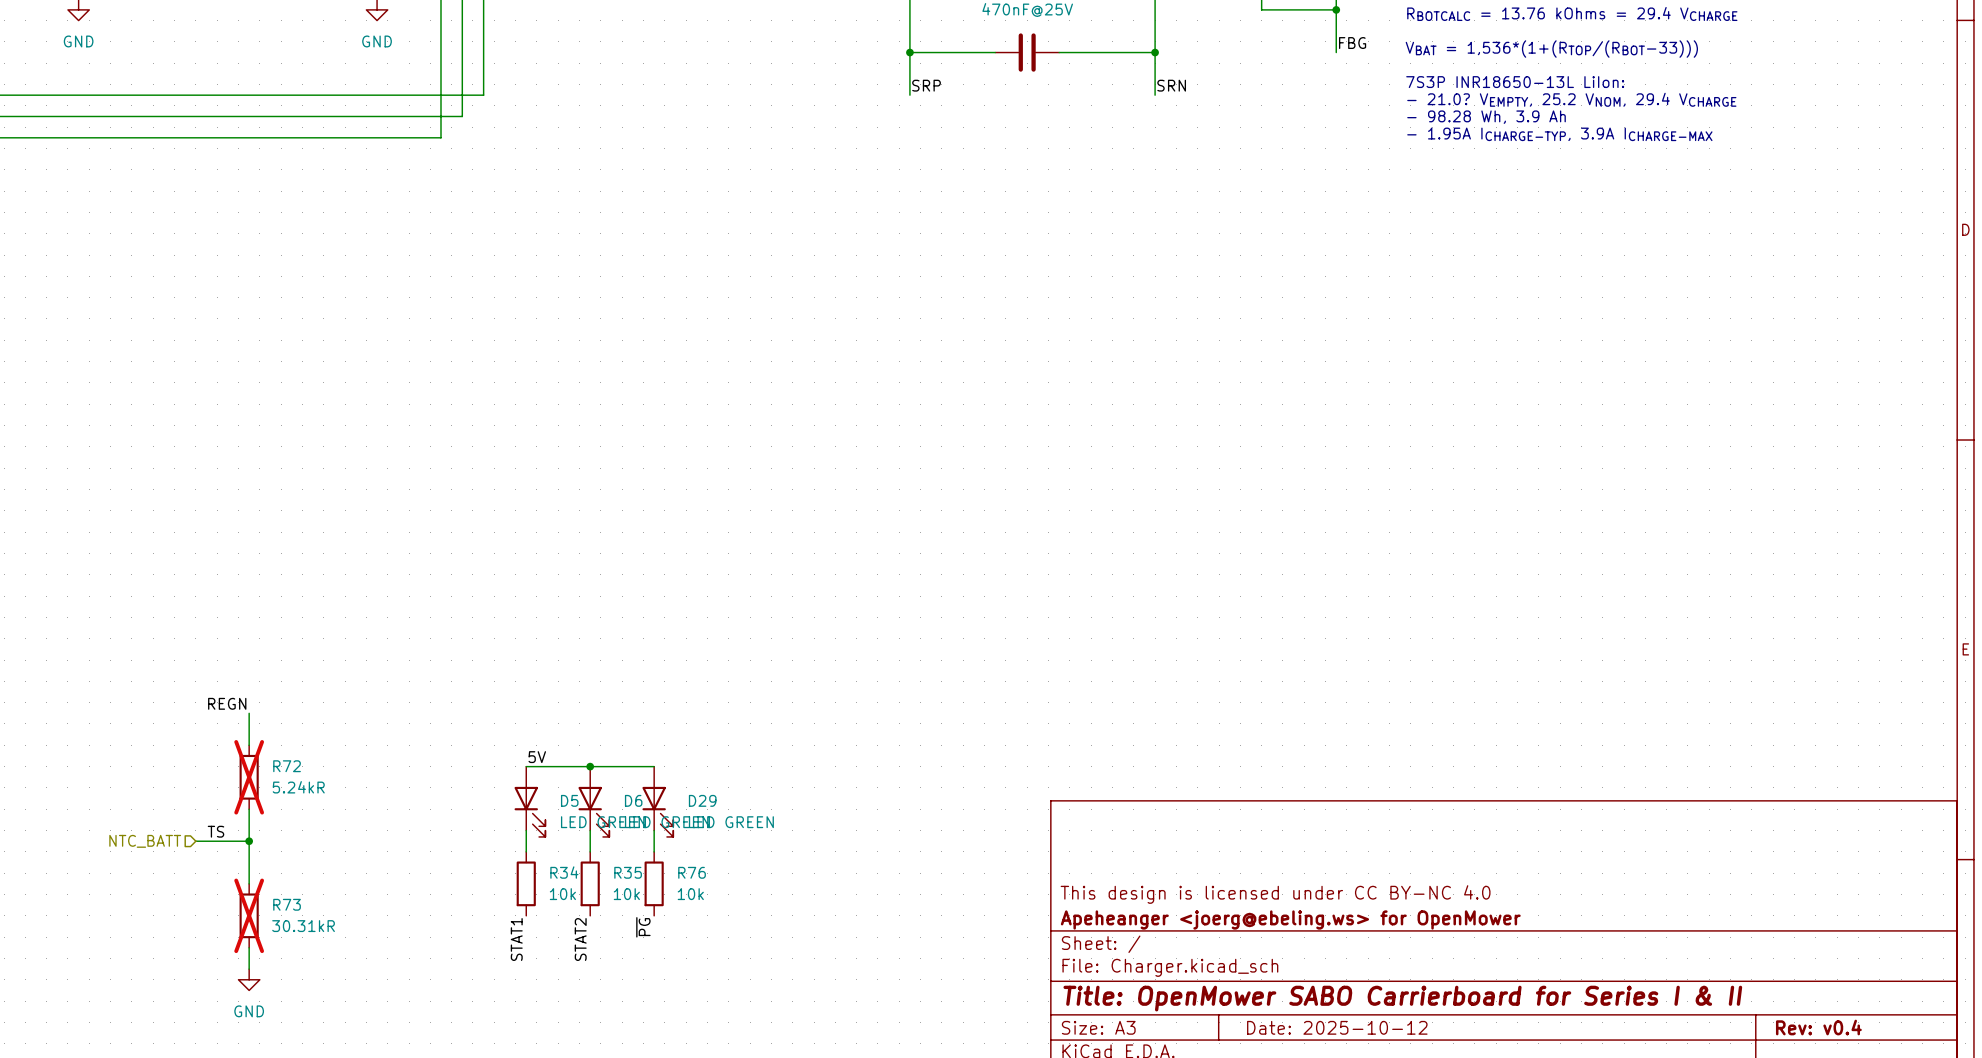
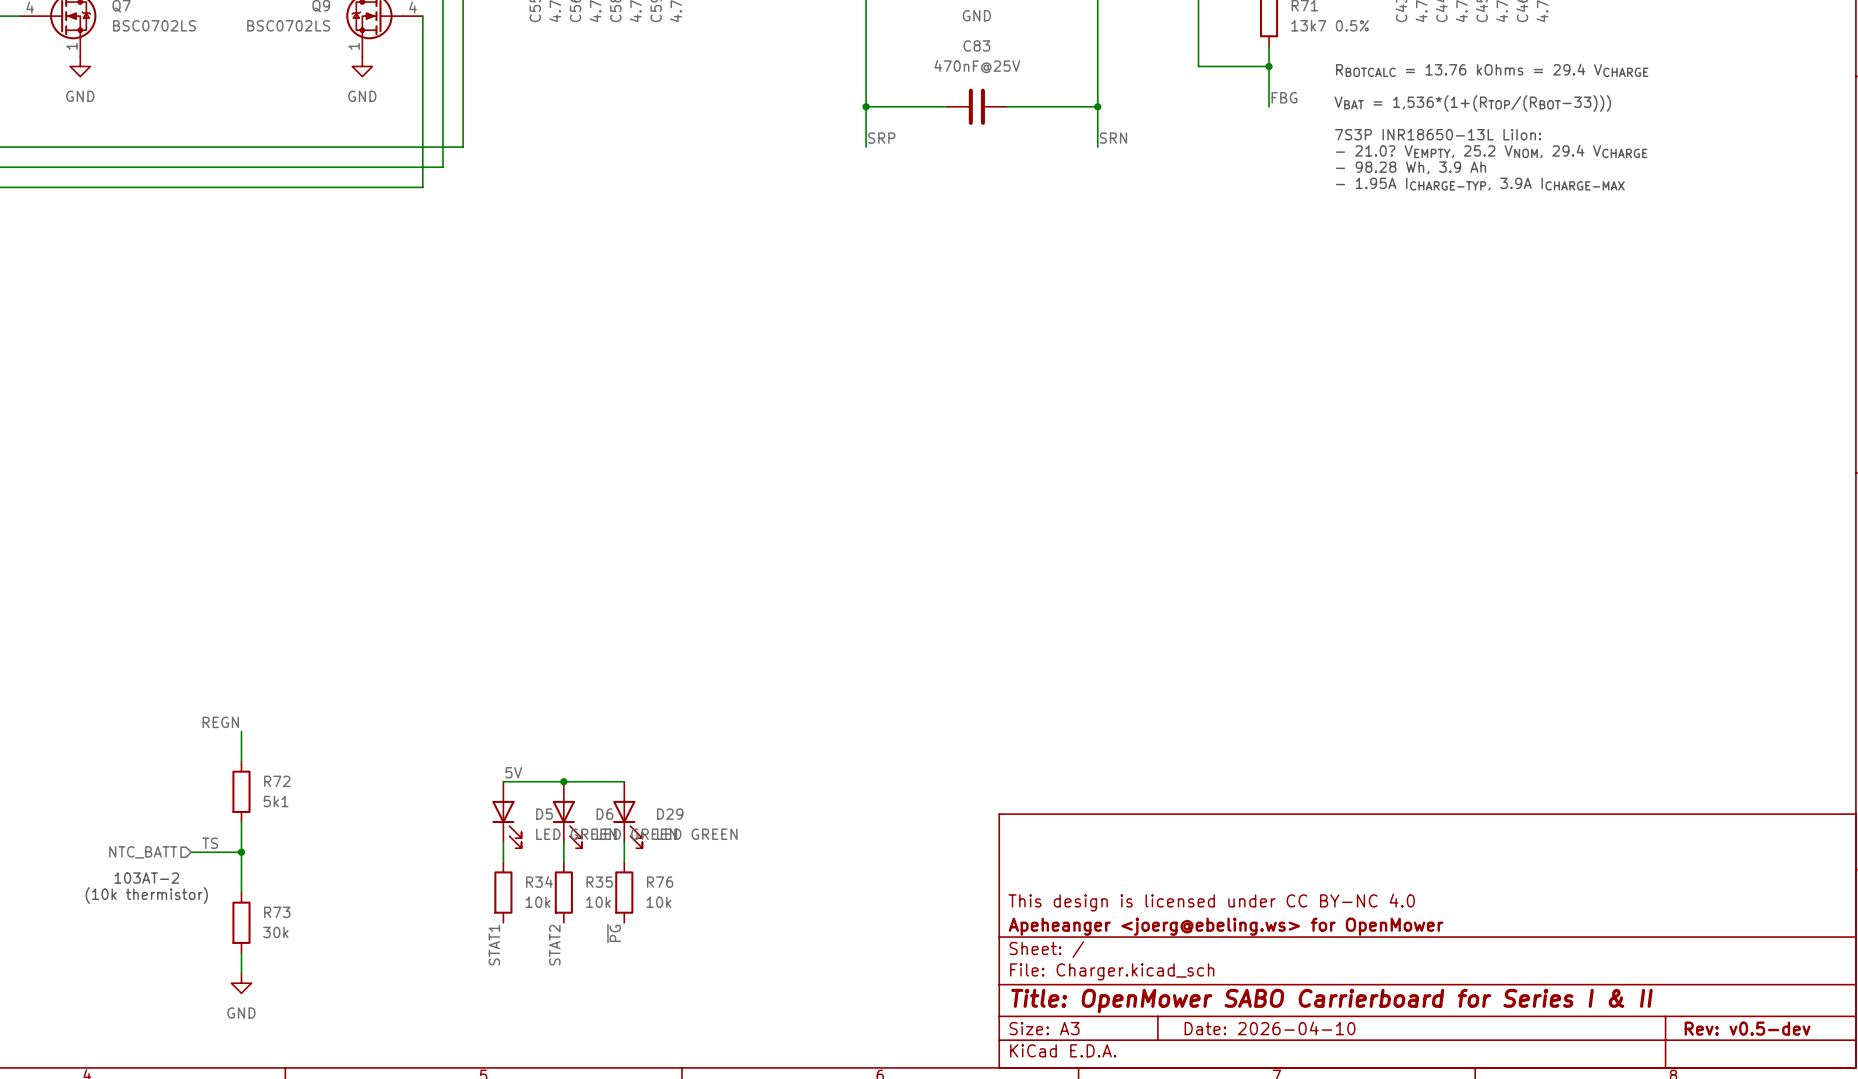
R72 do-not-place cross: (249, 777) -> none
R72 value: 5.24kR (298, 787) -> 5k1 (276, 801)
text: none -> 103AT-2 (146, 878)
text: none -> (10k thermistor) (146, 895)
R73 do-not-place cross: (249, 915) -> none
R73 value: 30.31kR (303, 926) -> 30k (275, 932)
title block: Date: 2025-10-12 (1337, 1027) -> Date: 2026-04-10 (1270, 1028)
title block: Rev: v0.4 (1818, 1027) -> Rev: v0.5-dev (1747, 1028)

